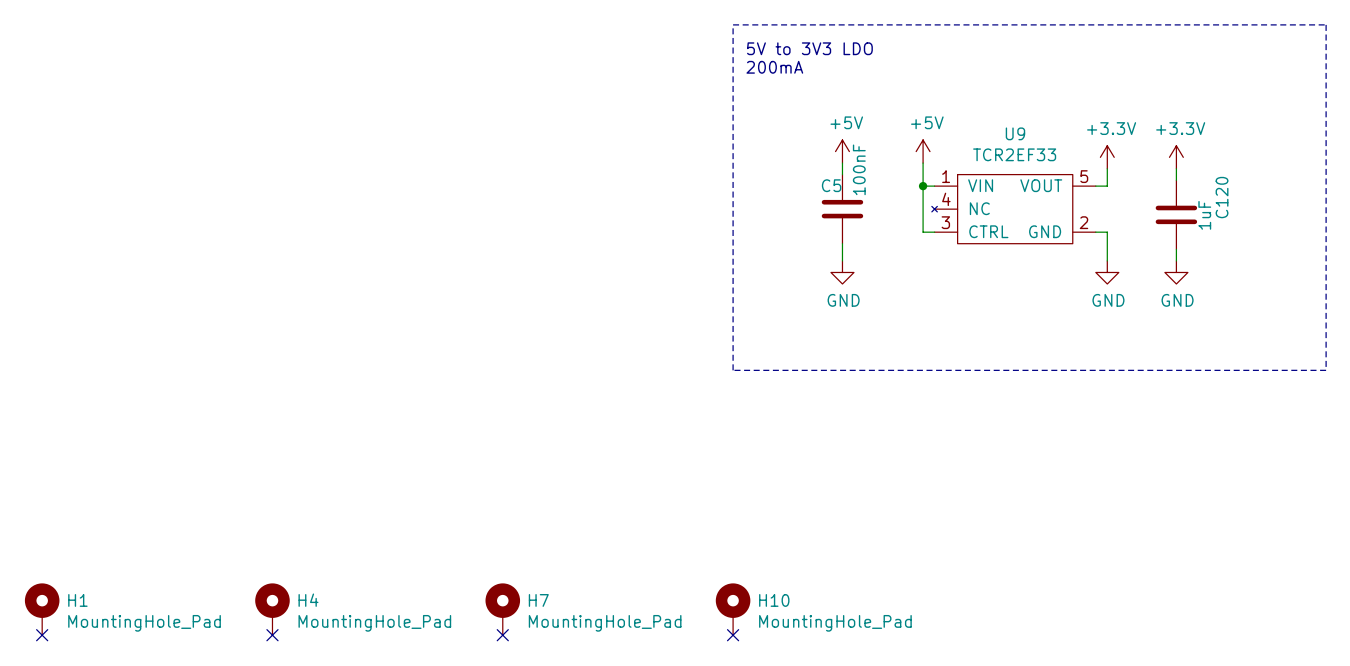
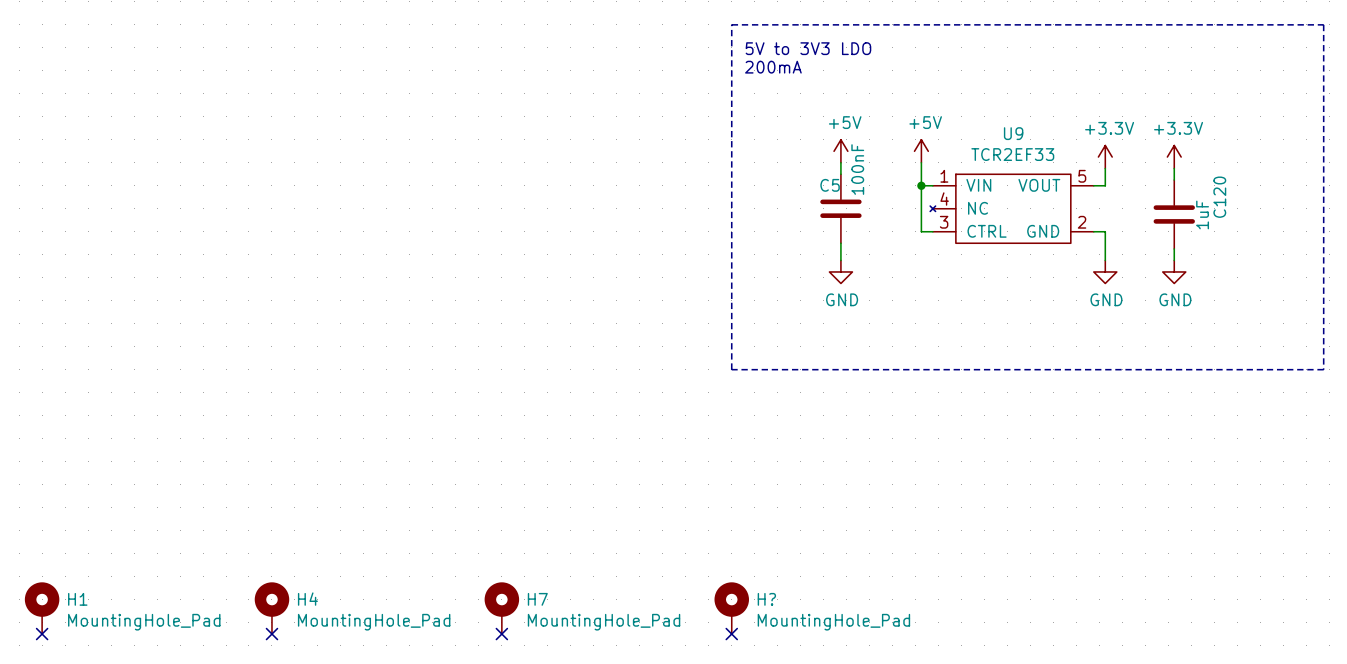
H10 name: H10 (774, 600) -> H? (766, 599)

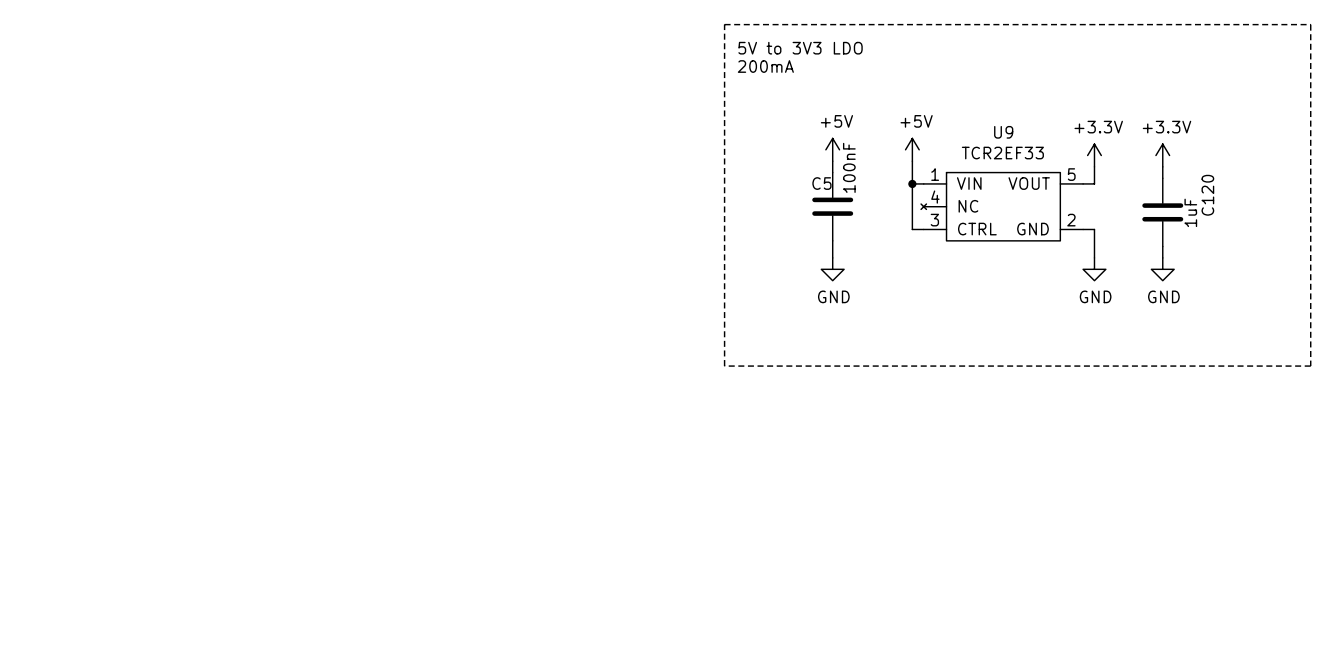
H1: MountingHole_Pad (42, 608) -> none
H4: MountingHole_Pad (271, 608) -> none
H7: MountingHole_Pad (501, 608) -> none
H?: MountingHole_Pad (731, 608) -> none
no-connect mark: (42, 634) -> none
no-connect mark: (271, 634) -> none
no-connect mark: (501, 634) -> none
no-connect mark: (731, 634) -> none

